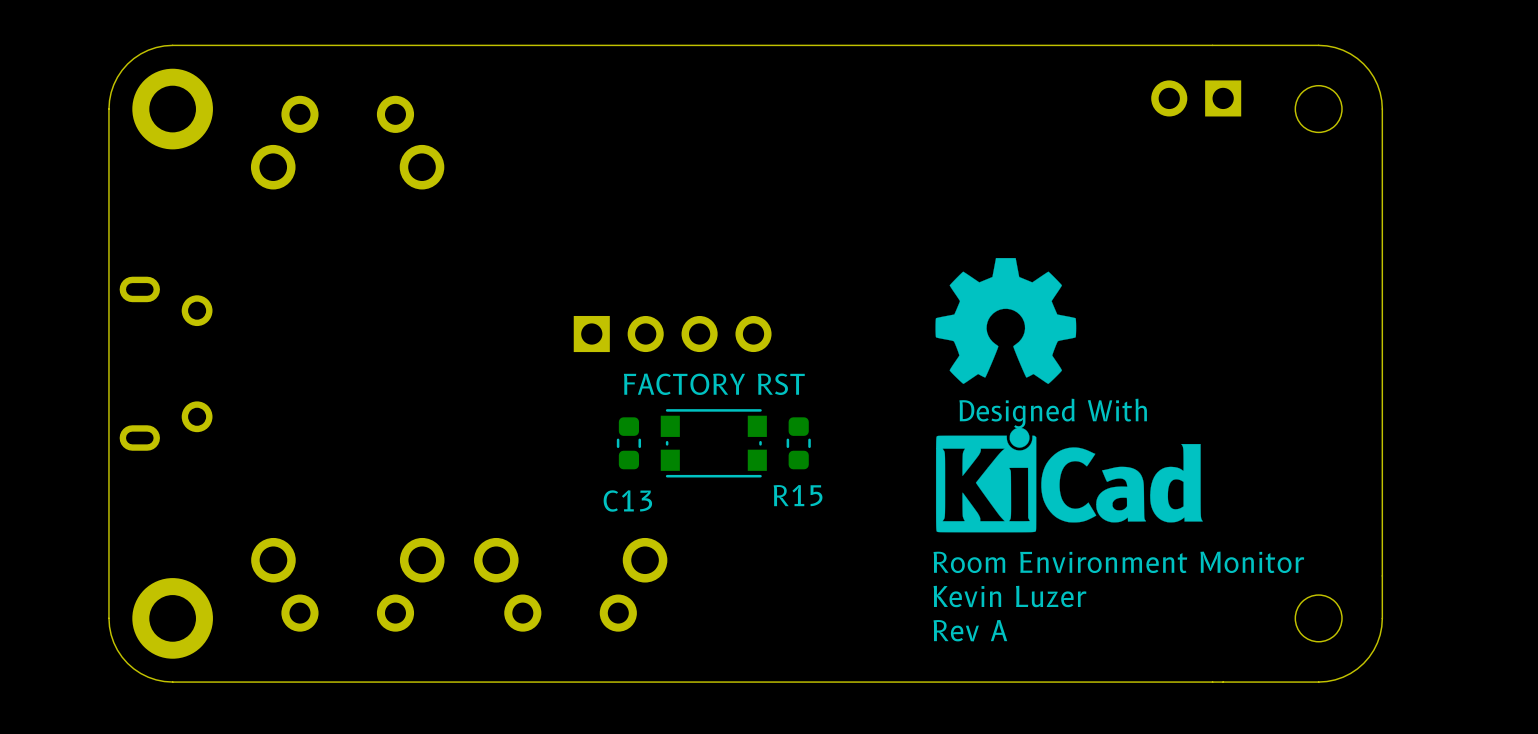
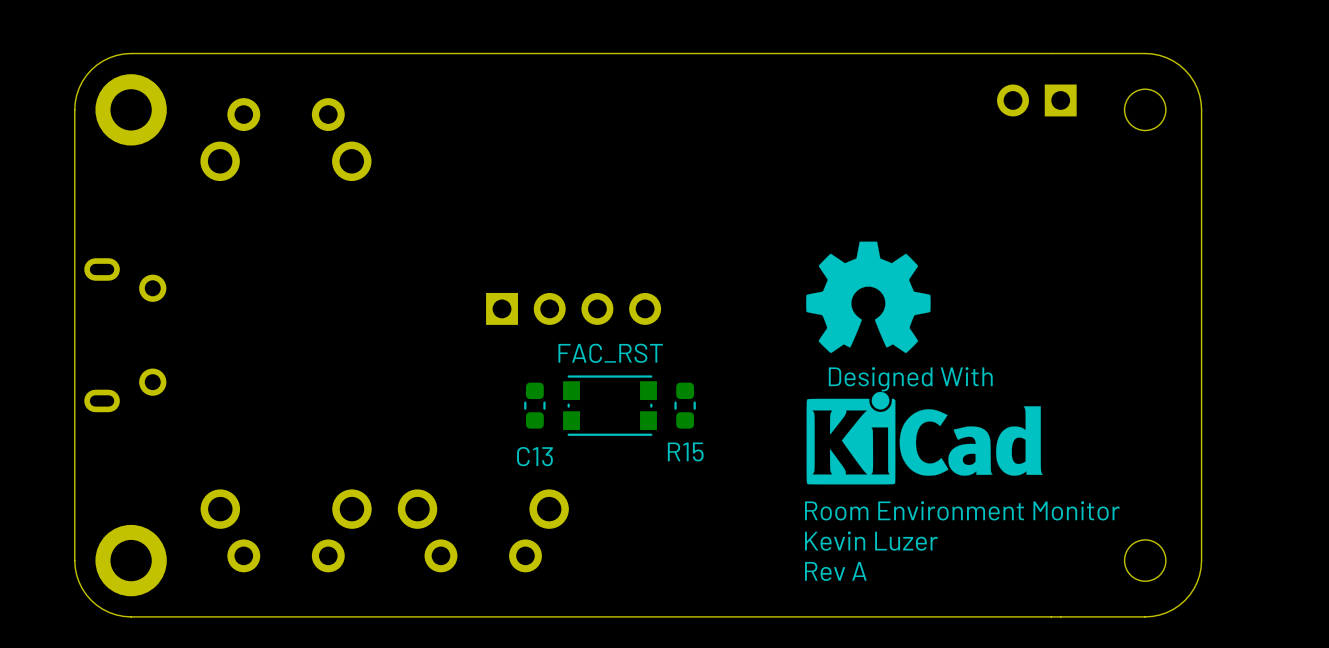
text: FACTORY RST (714, 384) -> FAC_RST (610, 353)

